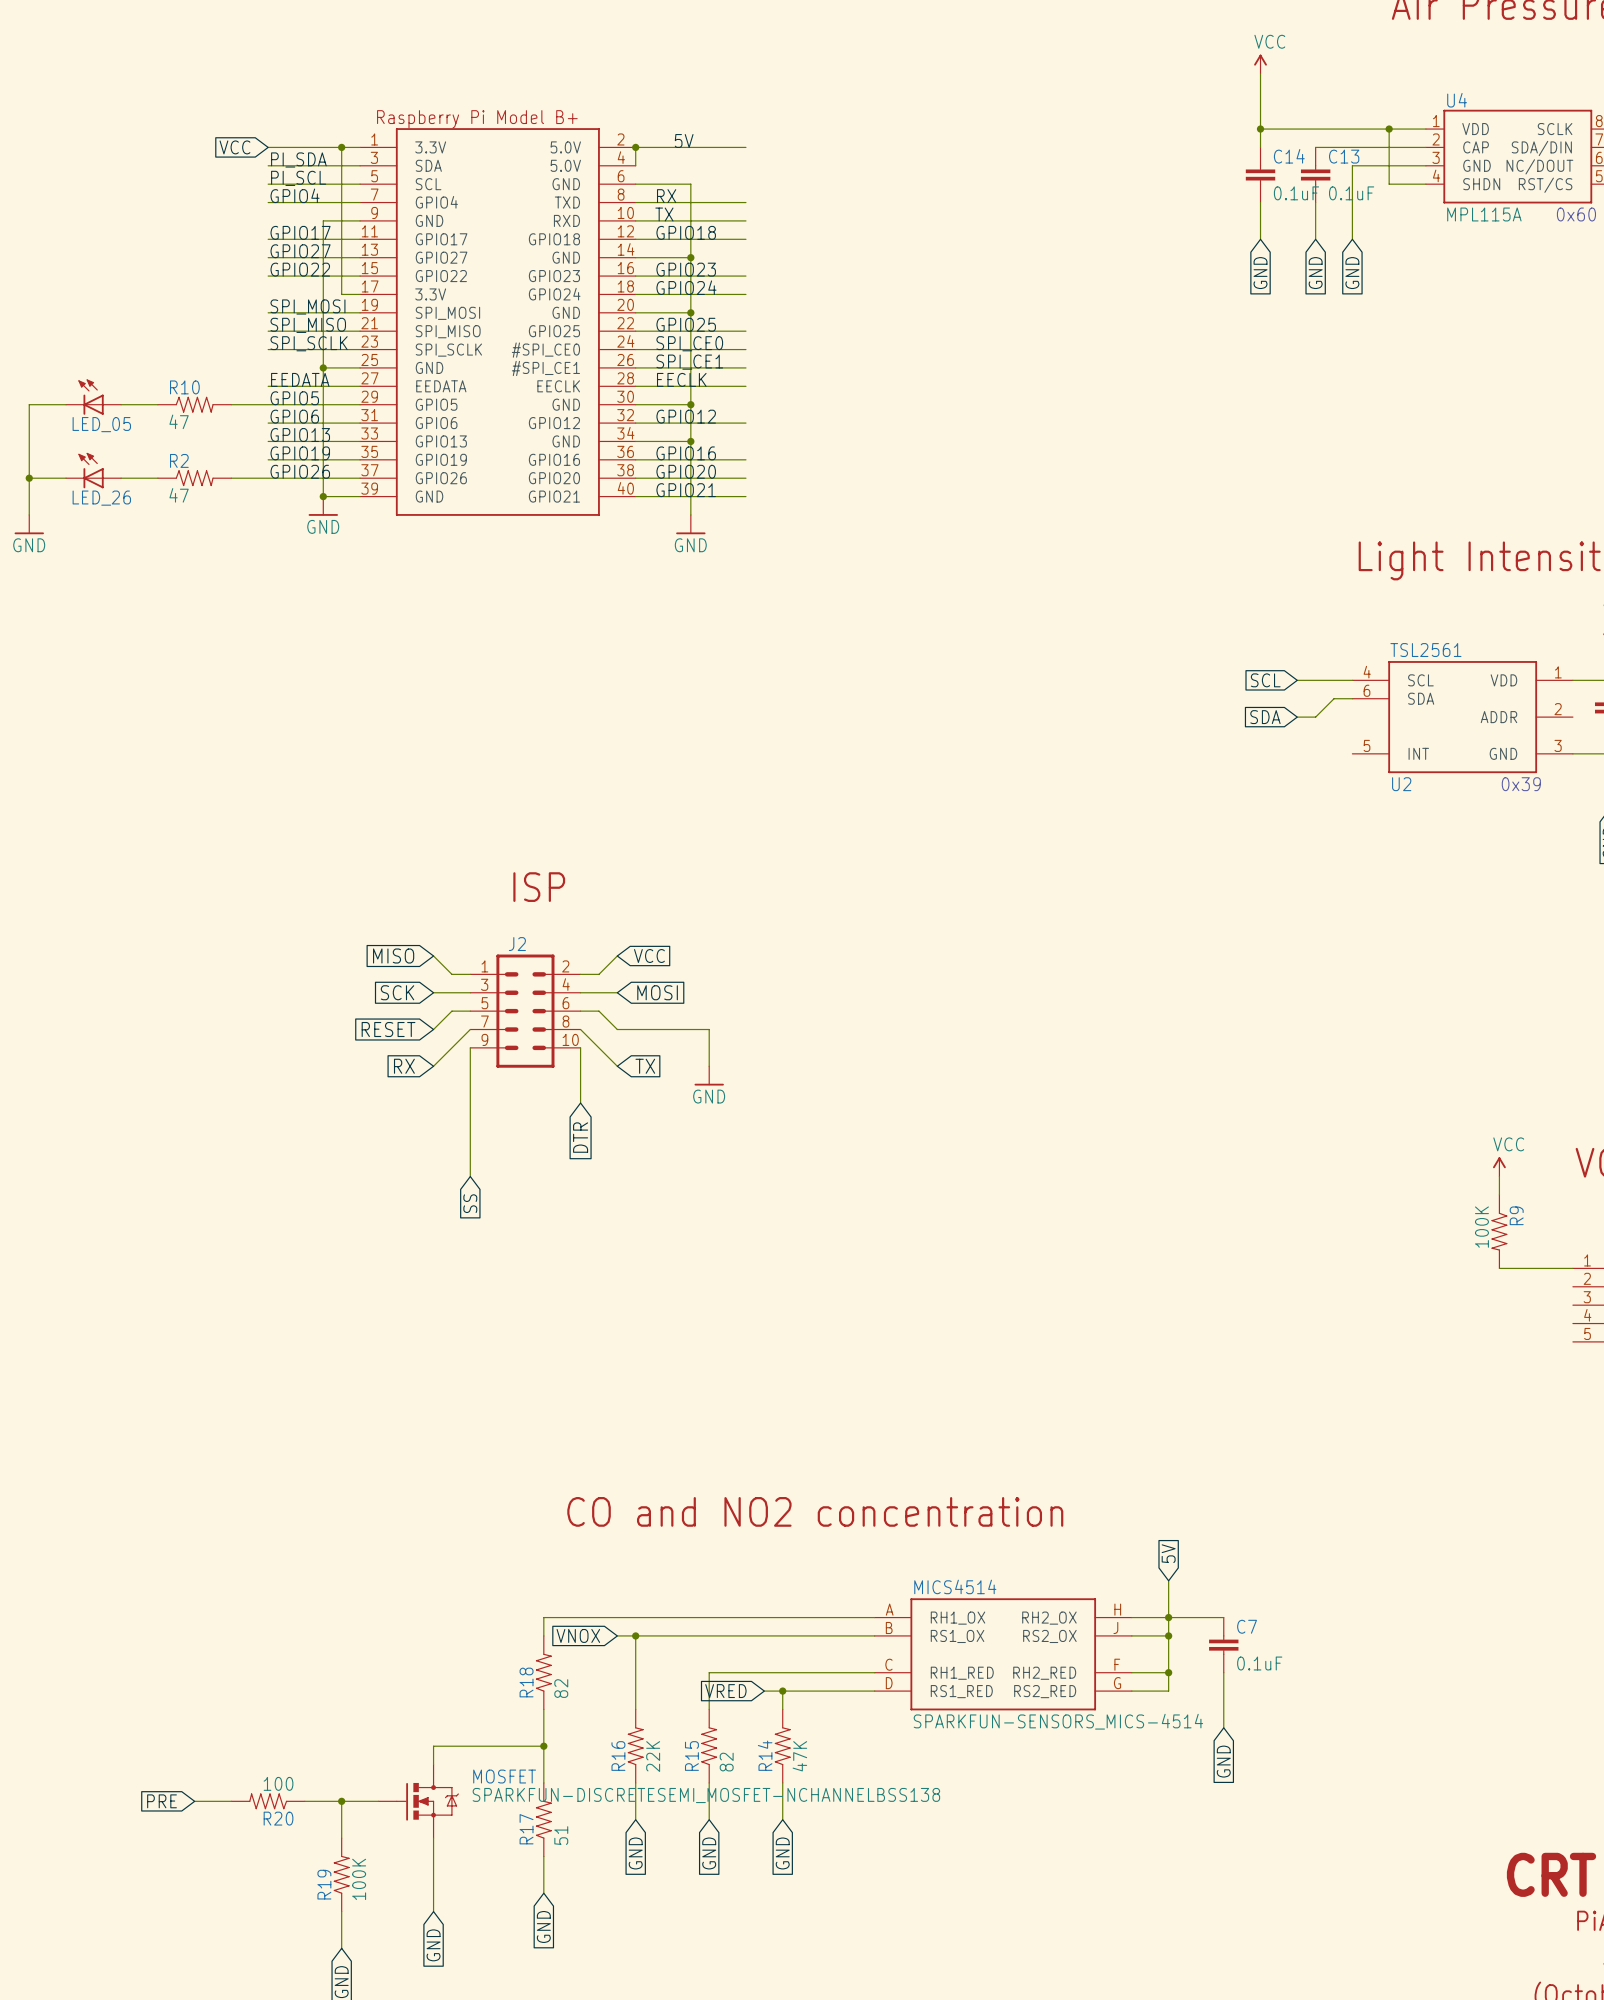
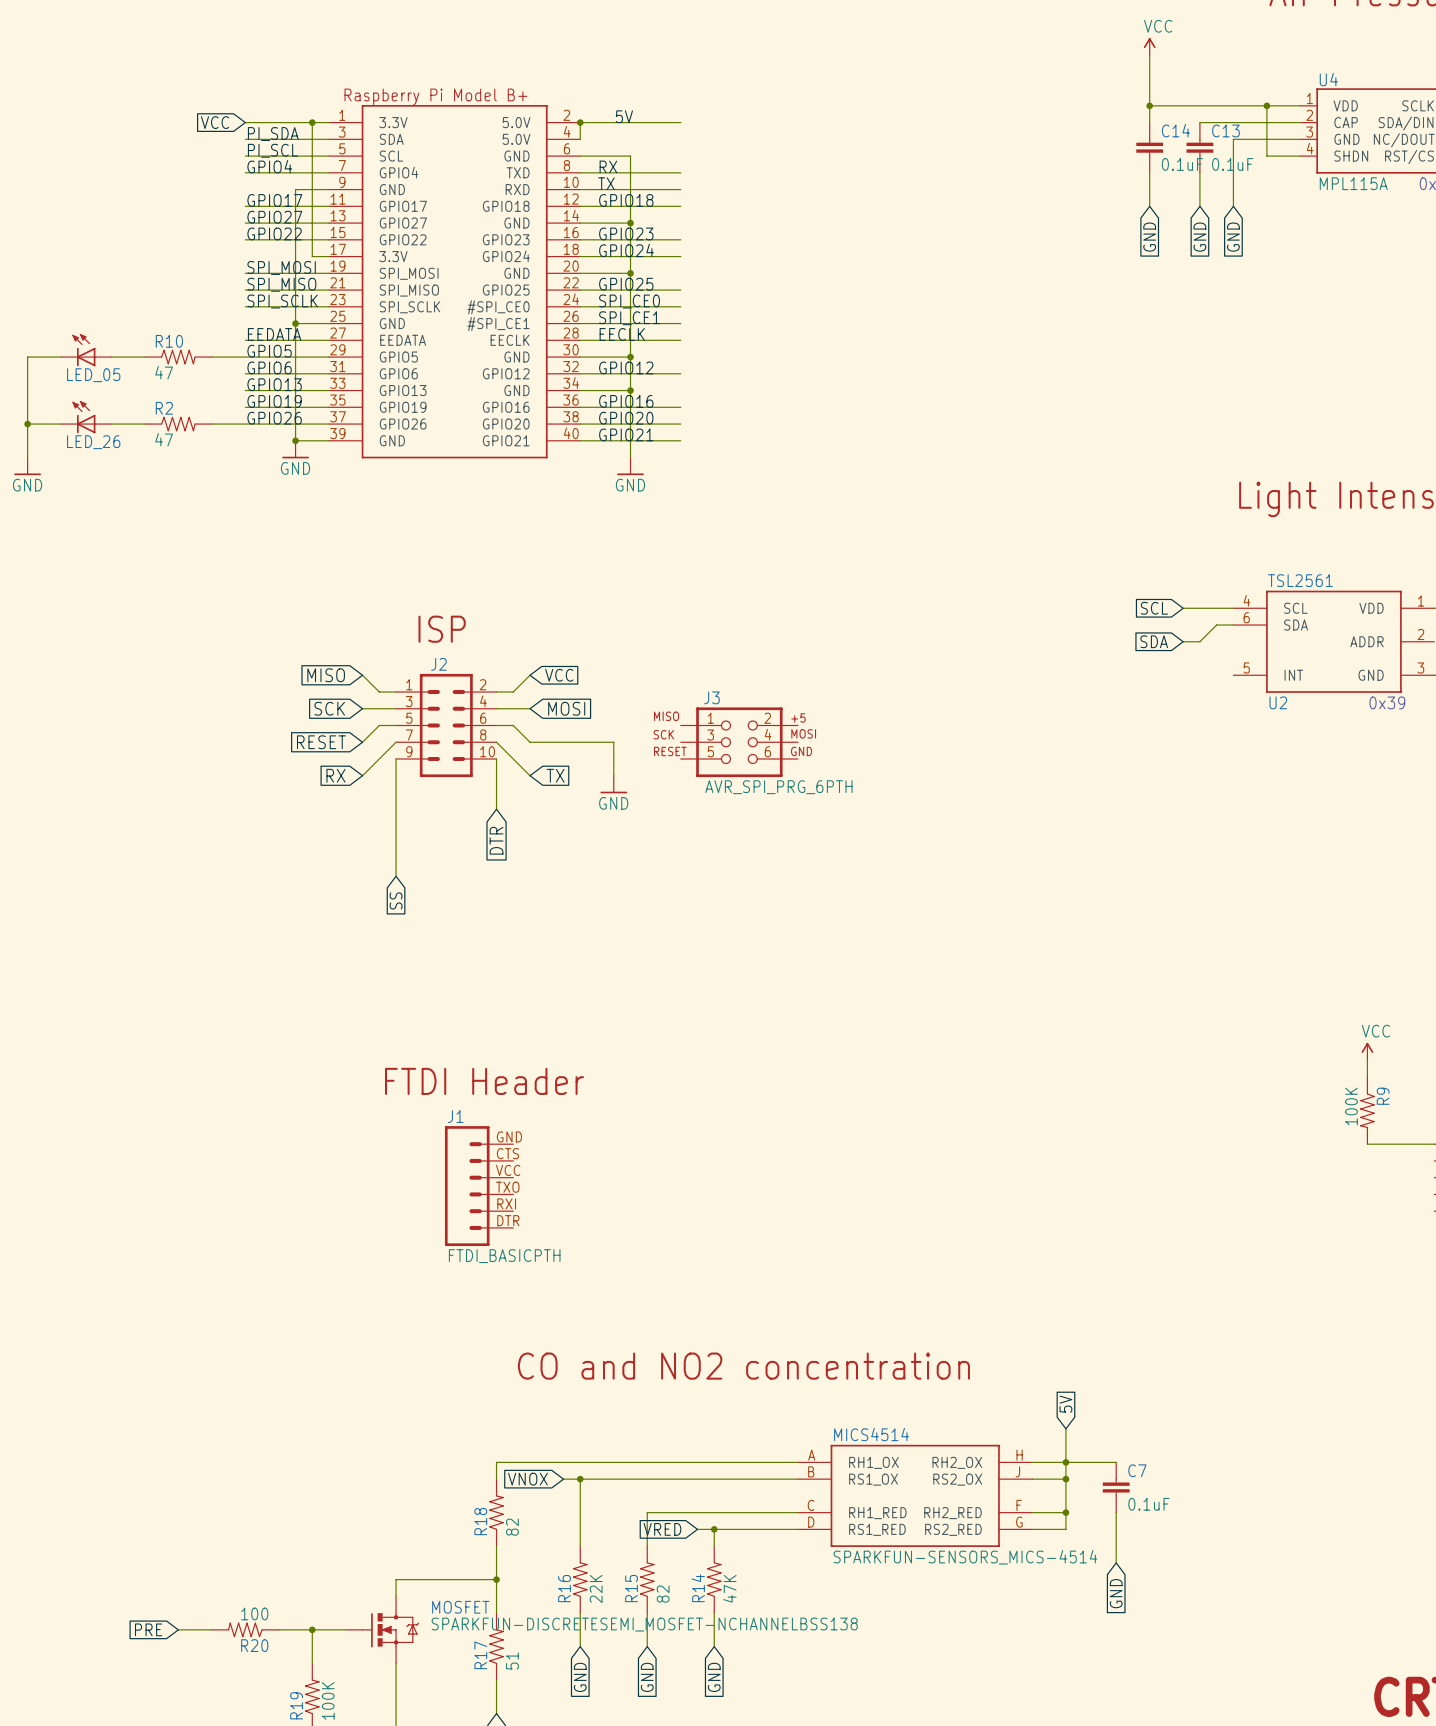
text: none -> ISP (442, 629)
global label: none -> MISO (326, 675)
wire: none -> (362, 675) (379, 692) (396, 692)
wire: none -> (530, 675) (513, 692) (496, 692)
global label: none -> VCC (559, 675)
global label: none -> SCK (329, 708)
wire: none -> (362, 708) (396, 708)
wire: none -> (496, 708) (530, 708)
global label: none -> MOSI (566, 708)
wire: none -> (396, 725) (379, 725) (362, 742)
wire: none -> (496, 725) (513, 725) (530, 742) (613, 742) (613, 775)
global label: none -> RESET (321, 742)
wire: none -> (396, 742) (362, 775)
wire: none -> (496, 742) (530, 775)
J3: none -> AVR_SPI_PRG_6PTH (739, 742)
wire: none -> (396, 759) (396, 876)
wire: none -> (496, 759) (496, 809)
global label: none -> RX (335, 775)
global label: none -> TX (555, 775)
power symbol: none -> GND (613, 784)
text: ISP (539, 887) -> none
global label: none -> DTR (496, 840)
global label: MISO (393, 956) -> none
wire: (433, 956) (451, 974) (470, 974) -> none
wire: (617, 956) (598, 974) (580, 974) -> none
global label: VCC (649, 956) -> none
global label: SCK (397, 992) -> none
wire: (433, 992) (470, 992) -> none
wire: (580, 992) (617, 992) -> none
global label: MOSI (657, 992) -> none
global label: none -> SS (396, 900)
wire: (470, 1011) (451, 1011) (433, 1029) -> none
J2 position: (525, 1011) -> (446, 725)
wire: (580, 1011) (598, 1011) (617, 1029) (709, 1029) (709, 1066) -> none
global label: RESET (388, 1029) -> none
wire: (470, 1029) (433, 1066) -> none
wire: (580, 1029) (617, 1066) -> none
wire: (470, 1047) (470, 1176) -> none
wire: (580, 1047) (580, 1103) -> none
global label: RX (404, 1066) -> none
global label: TX (645, 1066) -> none
power symbol: GND (709, 1075) -> none
global label: DTR (580, 1137) -> none
text: none -> FTDI Header (484, 1081)
global label: SS (470, 1203) -> none
J1: none -> FTDI_BASICPTH (479, 1186)

